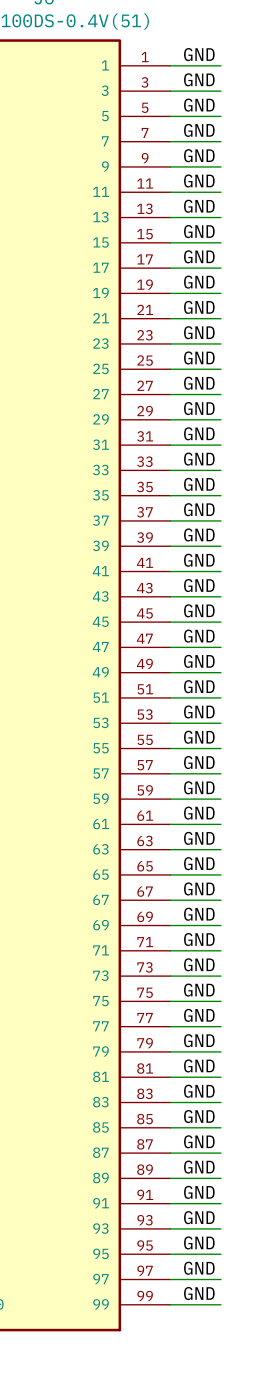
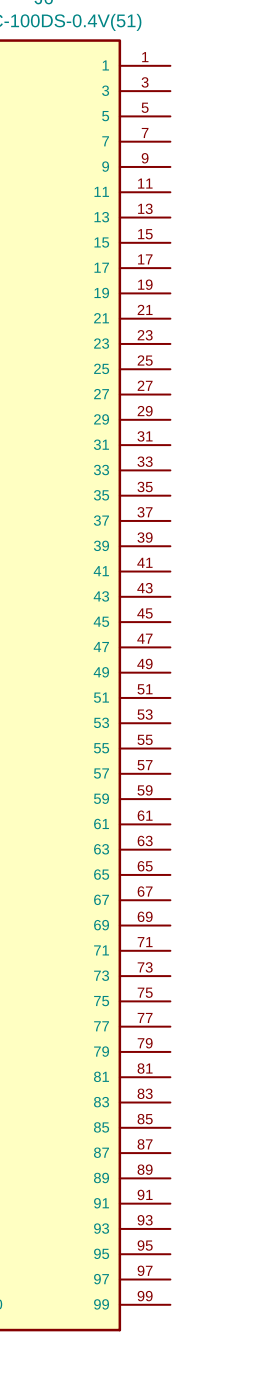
label: GND (199, 54) -> none
wire: (170, 65) (220, 65) -> none
label: GND (199, 79) -> none
wire: (170, 91) (220, 91) -> none
label: GND (199, 105) -> none
wire: (170, 116) (220, 116) -> none
label: GND (199, 130) -> none
wire: (170, 141) (220, 141) -> none
label: GND (199, 155) -> none
wire: (170, 166) (220, 166) -> none
label: GND (199, 180) -> none
wire: (170, 192) (220, 192) -> none
label: GND (199, 206) -> none
wire: (170, 217) (220, 217) -> none
label: GND (199, 231) -> none
wire: (170, 242) (220, 242) -> none
label: GND (199, 256) -> none
wire: (170, 268) (220, 268) -> none
label: GND (199, 282) -> none
wire: (170, 293) (220, 293) -> none
label: GND (199, 307) -> none
wire: (170, 318) (220, 318) -> none
label: GND (199, 332) -> none
wire: (170, 343) (220, 343) -> none
label: GND (199, 357) -> none
wire: (170, 369) (220, 369) -> none
label: GND (199, 383) -> none
wire: (170, 394) (220, 394) -> none
label: GND (199, 408) -> none
wire: (170, 419) (220, 419) -> none
label: GND (199, 433) -> none
wire: (170, 445) (220, 445) -> none
label: GND (199, 459) -> none
wire: (170, 470) (220, 470) -> none
label: GND (199, 484) -> none
wire: (170, 495) (220, 495) -> none
label: GND (199, 509) -> none
wire: (170, 520) (220, 520) -> none
label: GND (199, 534) -> none
wire: (170, 546) (220, 546) -> none
label: GND (199, 560) -> none
wire: (170, 571) (220, 571) -> none
label: GND (199, 585) -> none
wire: (170, 596) (220, 596) -> none
label: GND (199, 610) -> none
wire: (170, 622) (220, 622) -> none
label: GND (199, 636) -> none
wire: (170, 647) (220, 647) -> none
label: GND (199, 661) -> none
wire: (170, 672) (220, 672) -> none
label: GND (199, 686) -> none
wire: (170, 697) (220, 697) -> none
label: GND (199, 711) -> none
wire: (170, 723) (220, 723) -> none
label: GND (199, 737) -> none
wire: (170, 748) (220, 748) -> none
label: GND (199, 762) -> none
wire: (170, 773) (220, 773) -> none
label: GND (199, 787) -> none
wire: (170, 799) (220, 799) -> none
label: GND (199, 813) -> none
wire: (170, 824) (220, 824) -> none
label: GND (199, 838) -> none
wire: (170, 849) (220, 849) -> none
label: GND (199, 863) -> none
wire: (170, 874) (220, 874) -> none
label: GND (199, 888) -> none
wire: (170, 900) (220, 900) -> none
label: GND (199, 914) -> none
wire: (170, 925) (220, 925) -> none
label: GND (199, 939) -> none
wire: (170, 950) (220, 950) -> none
label: GND (199, 964) -> none
wire: (170, 976) (220, 976) -> none
label: GND (199, 990) -> none
wire: (170, 1001) (220, 1001) -> none
label: GND (199, 1015) -> none
wire: (170, 1026) (220, 1026) -> none
label: GND (199, 1040) -> none
wire: (170, 1051) (220, 1051) -> none
label: GND (199, 1065) -> none
wire: (170, 1077) (220, 1077) -> none
label: GND (199, 1091) -> none
wire: (170, 1102) (220, 1102) -> none
label: GND (199, 1116) -> none
wire: (170, 1127) (220, 1127) -> none
label: GND (199, 1141) -> none
wire: (170, 1153) (220, 1153) -> none
label: GND (199, 1167) -> none
wire: (170, 1178) (220, 1178) -> none
label: GND (199, 1192) -> none
wire: (170, 1203) (220, 1203) -> none
label: GND (199, 1217) -> none
wire: (170, 1228) (220, 1228) -> none
label: GND (199, 1242) -> none
wire: (170, 1254) (220, 1254) -> none
label: GND (199, 1268) -> none
wire: (170, 1279) (220, 1279) -> none
label: GND (199, 1293) -> none
wire: (170, 1304) (220, 1304) -> none

